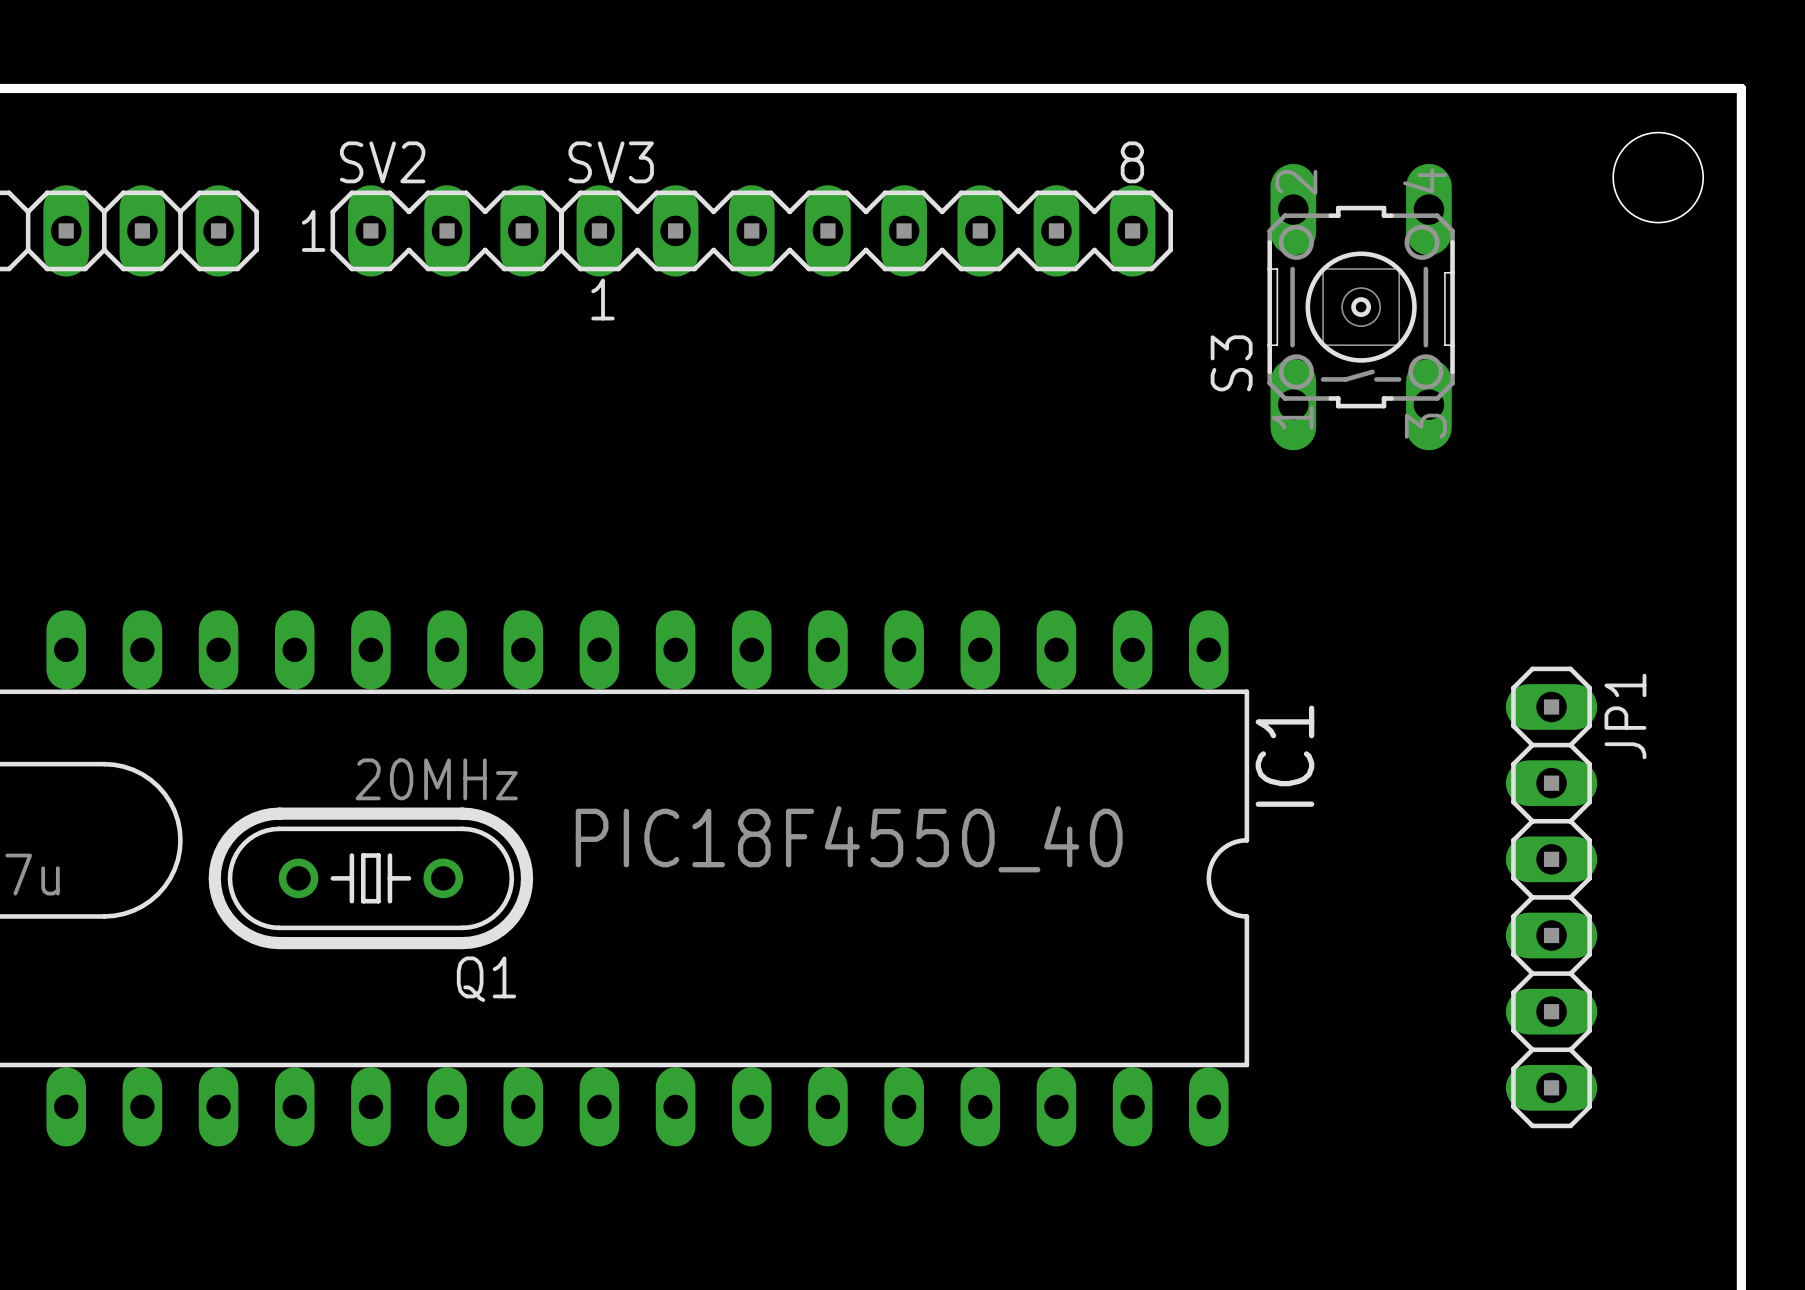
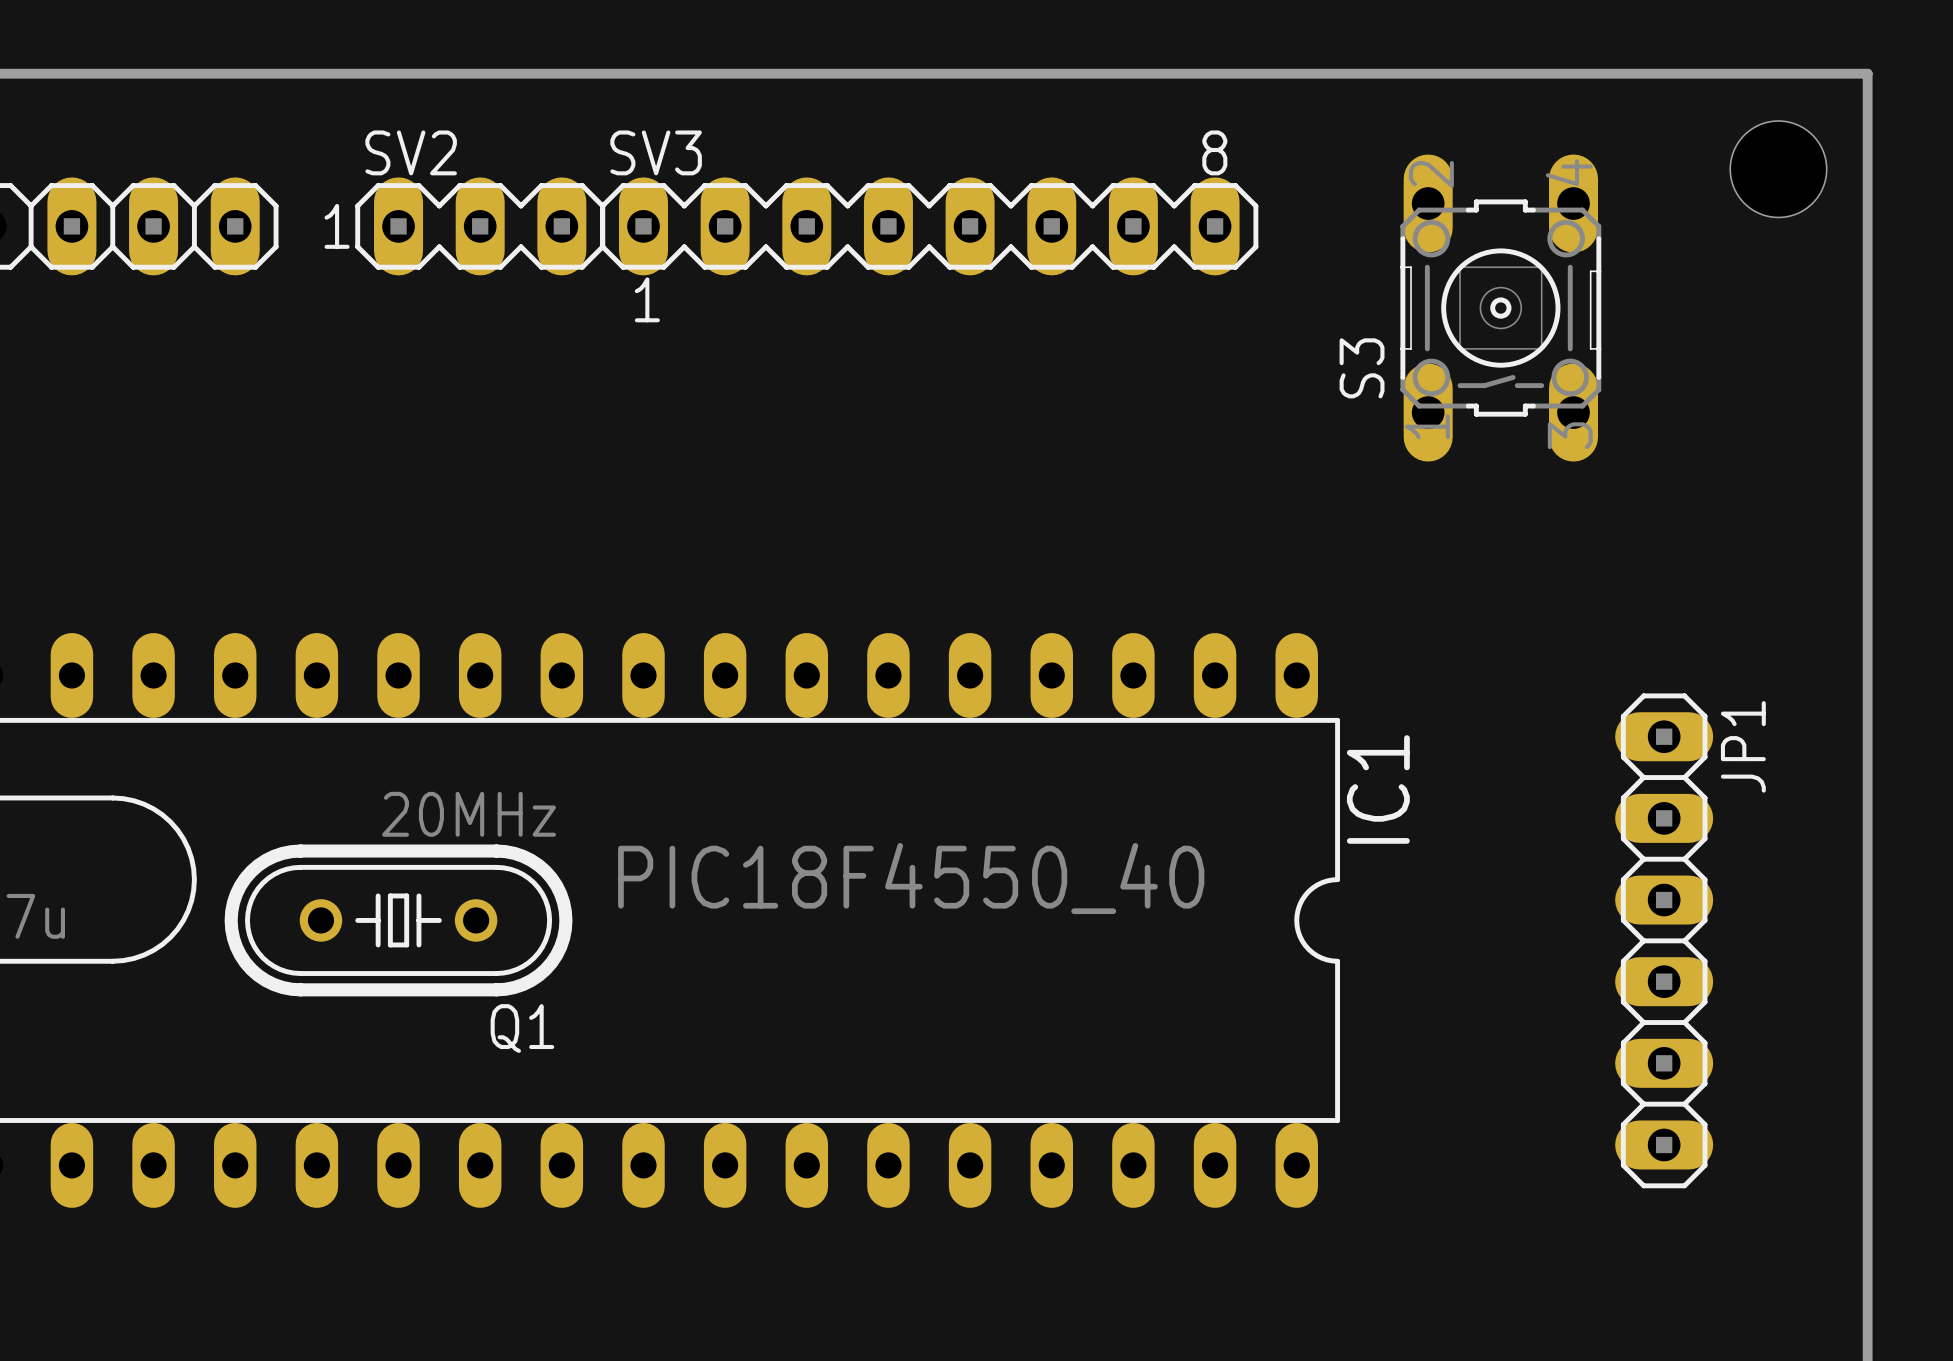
S3 position: (1361, 307) -> (1500, 308)

